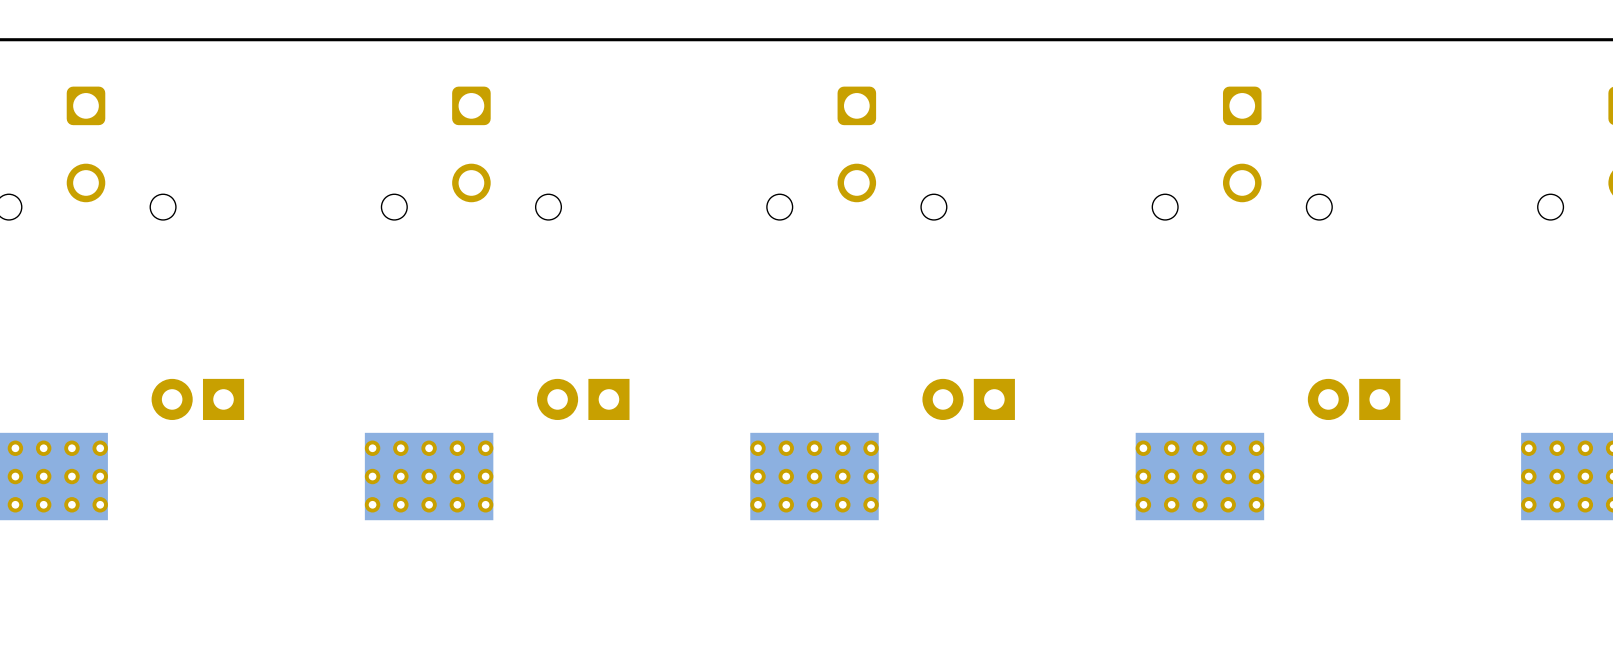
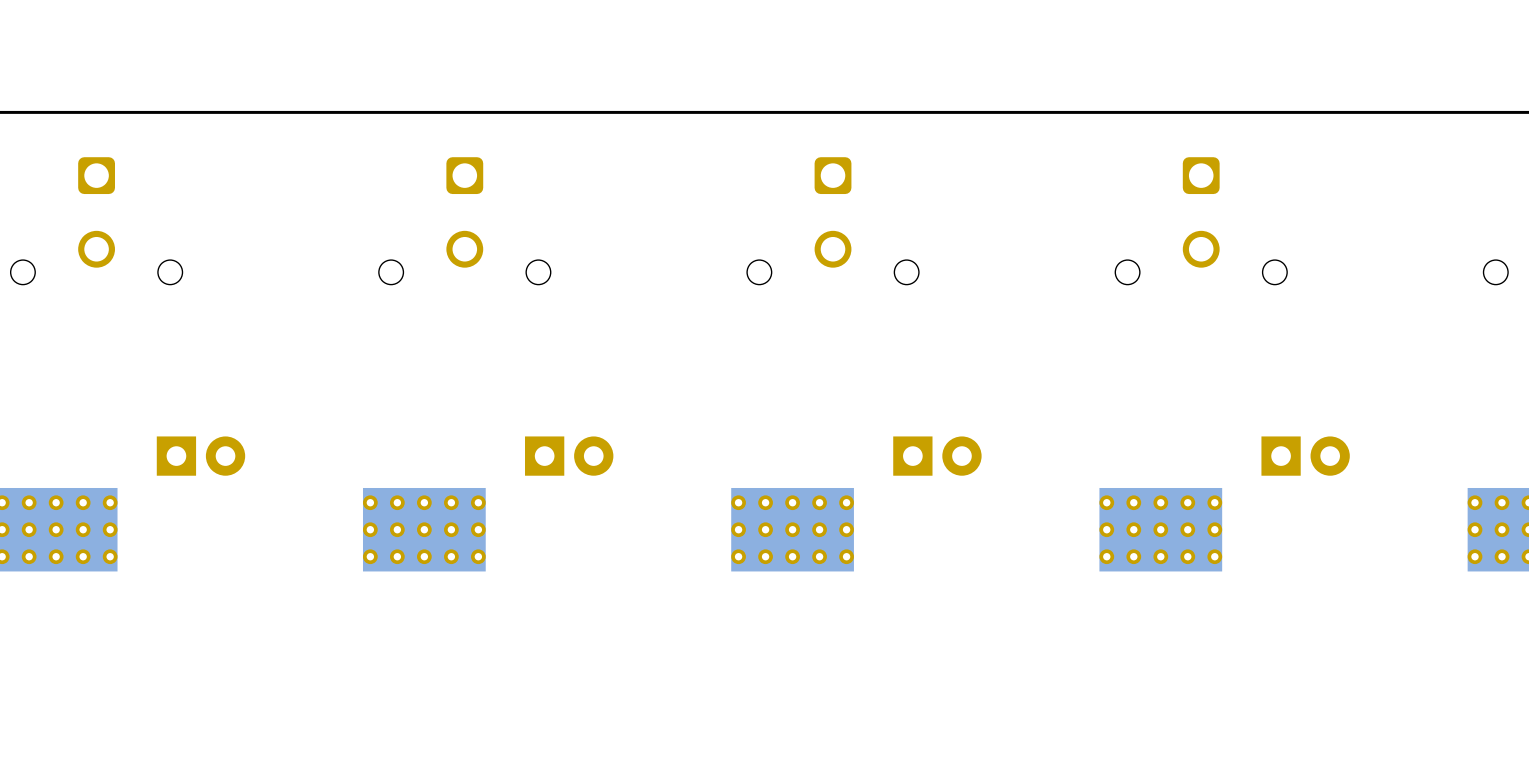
part rotation: 0° (197, 399) -> 180° (200, 456)
part rotation: 0° (583, 399) -> 180° (569, 456)
part rotation: 0° (968, 399) -> 180° (937, 456)
part rotation: 0° (1354, 399) -> 180° (1305, 456)

